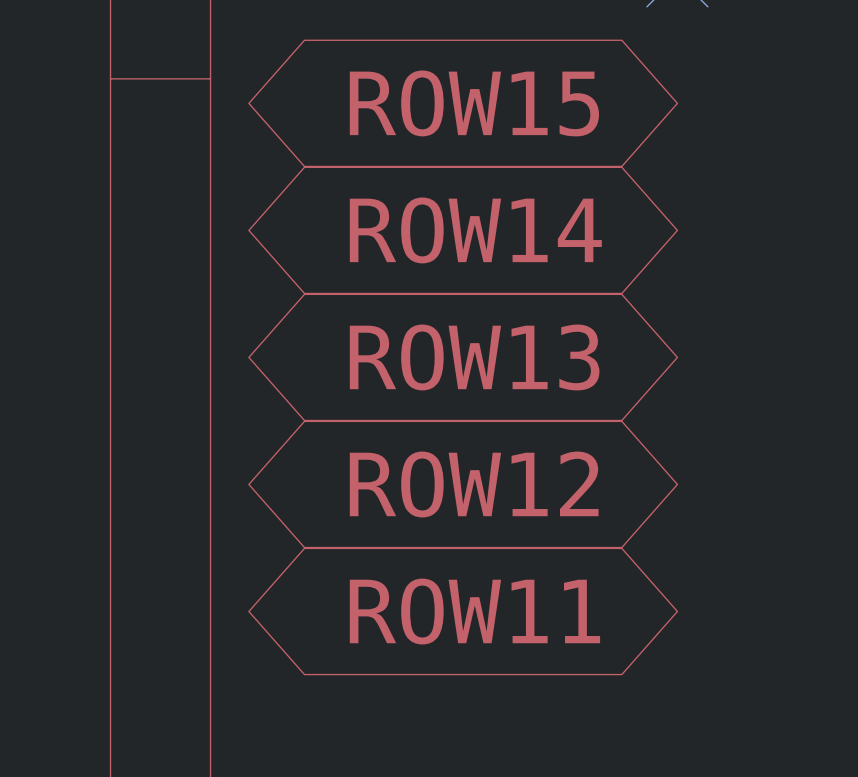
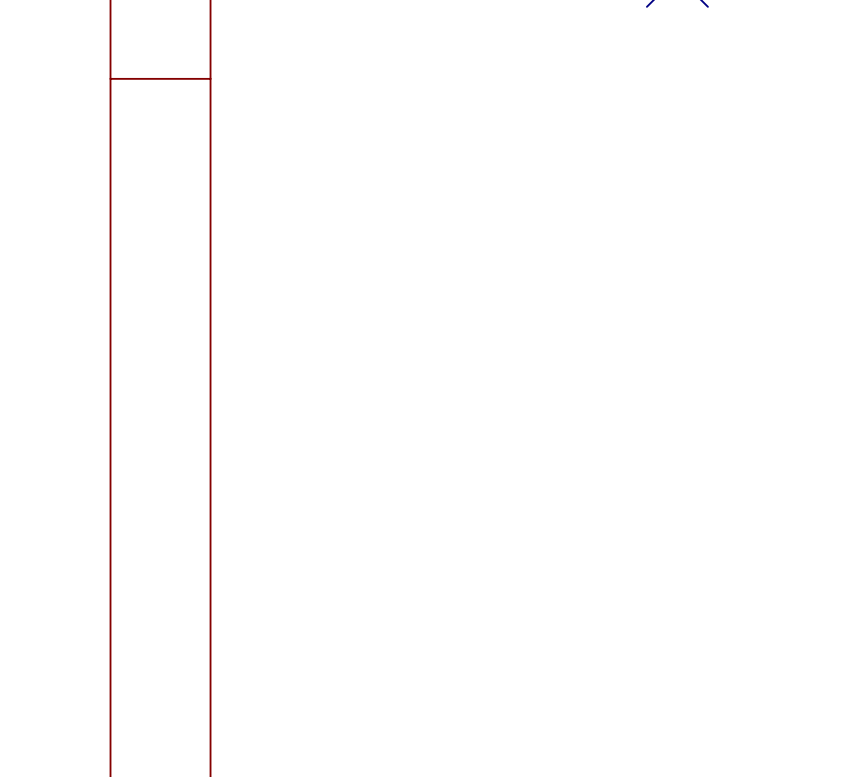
global label: ROW15 (474, 103) -> none
global label: ROW14 (475, 230) -> none
global label: ROW13 (474, 357) -> none
global label: ROW12 (474, 484) -> none
global label: ROW11 (474, 611) -> none

